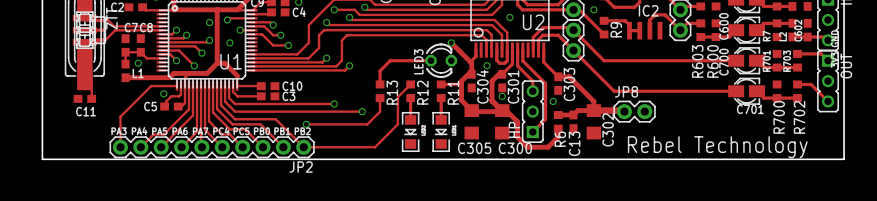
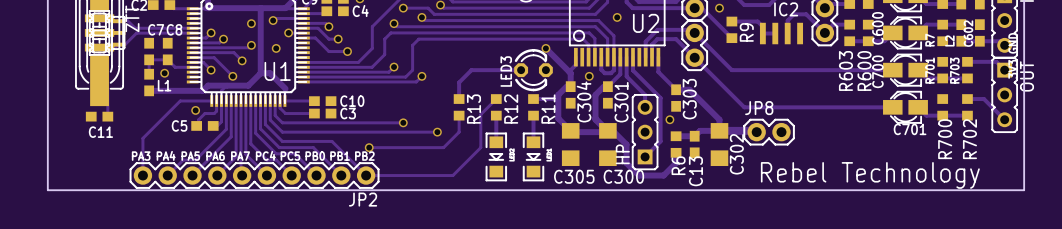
via: (502, 96) -> none

